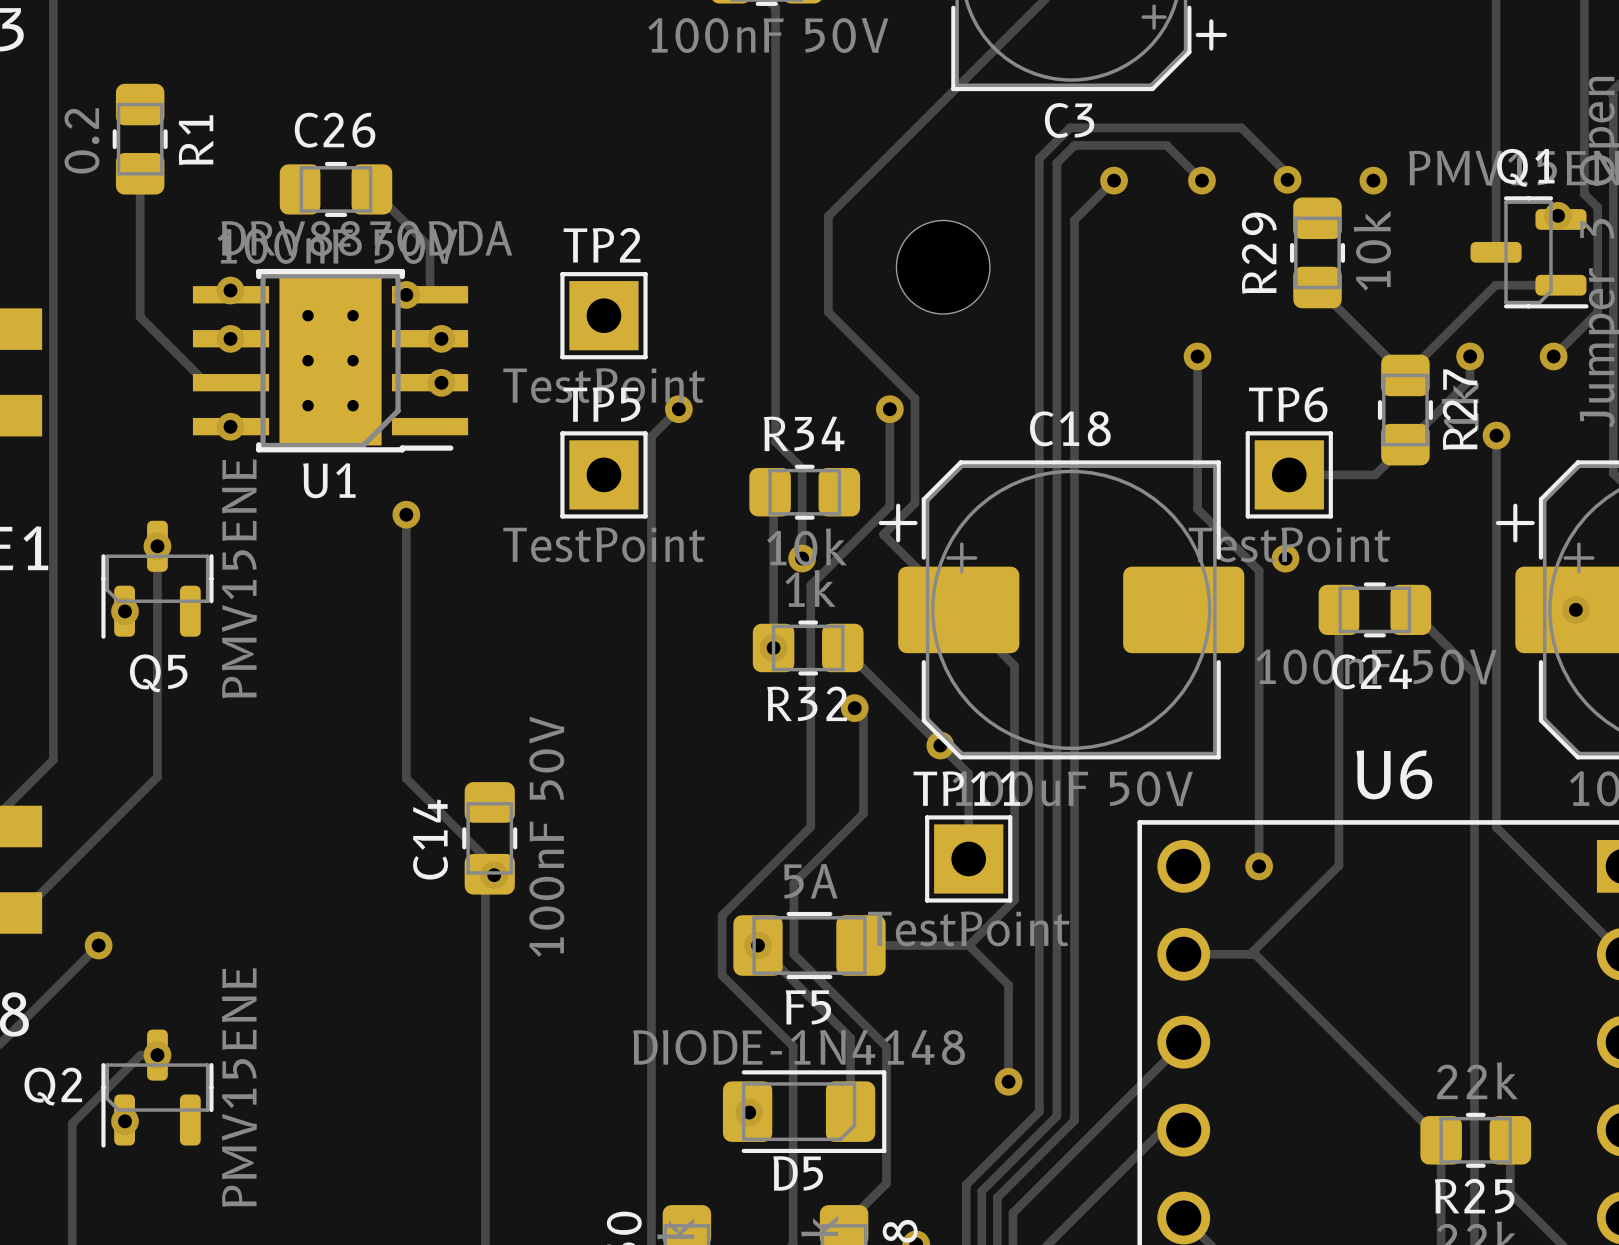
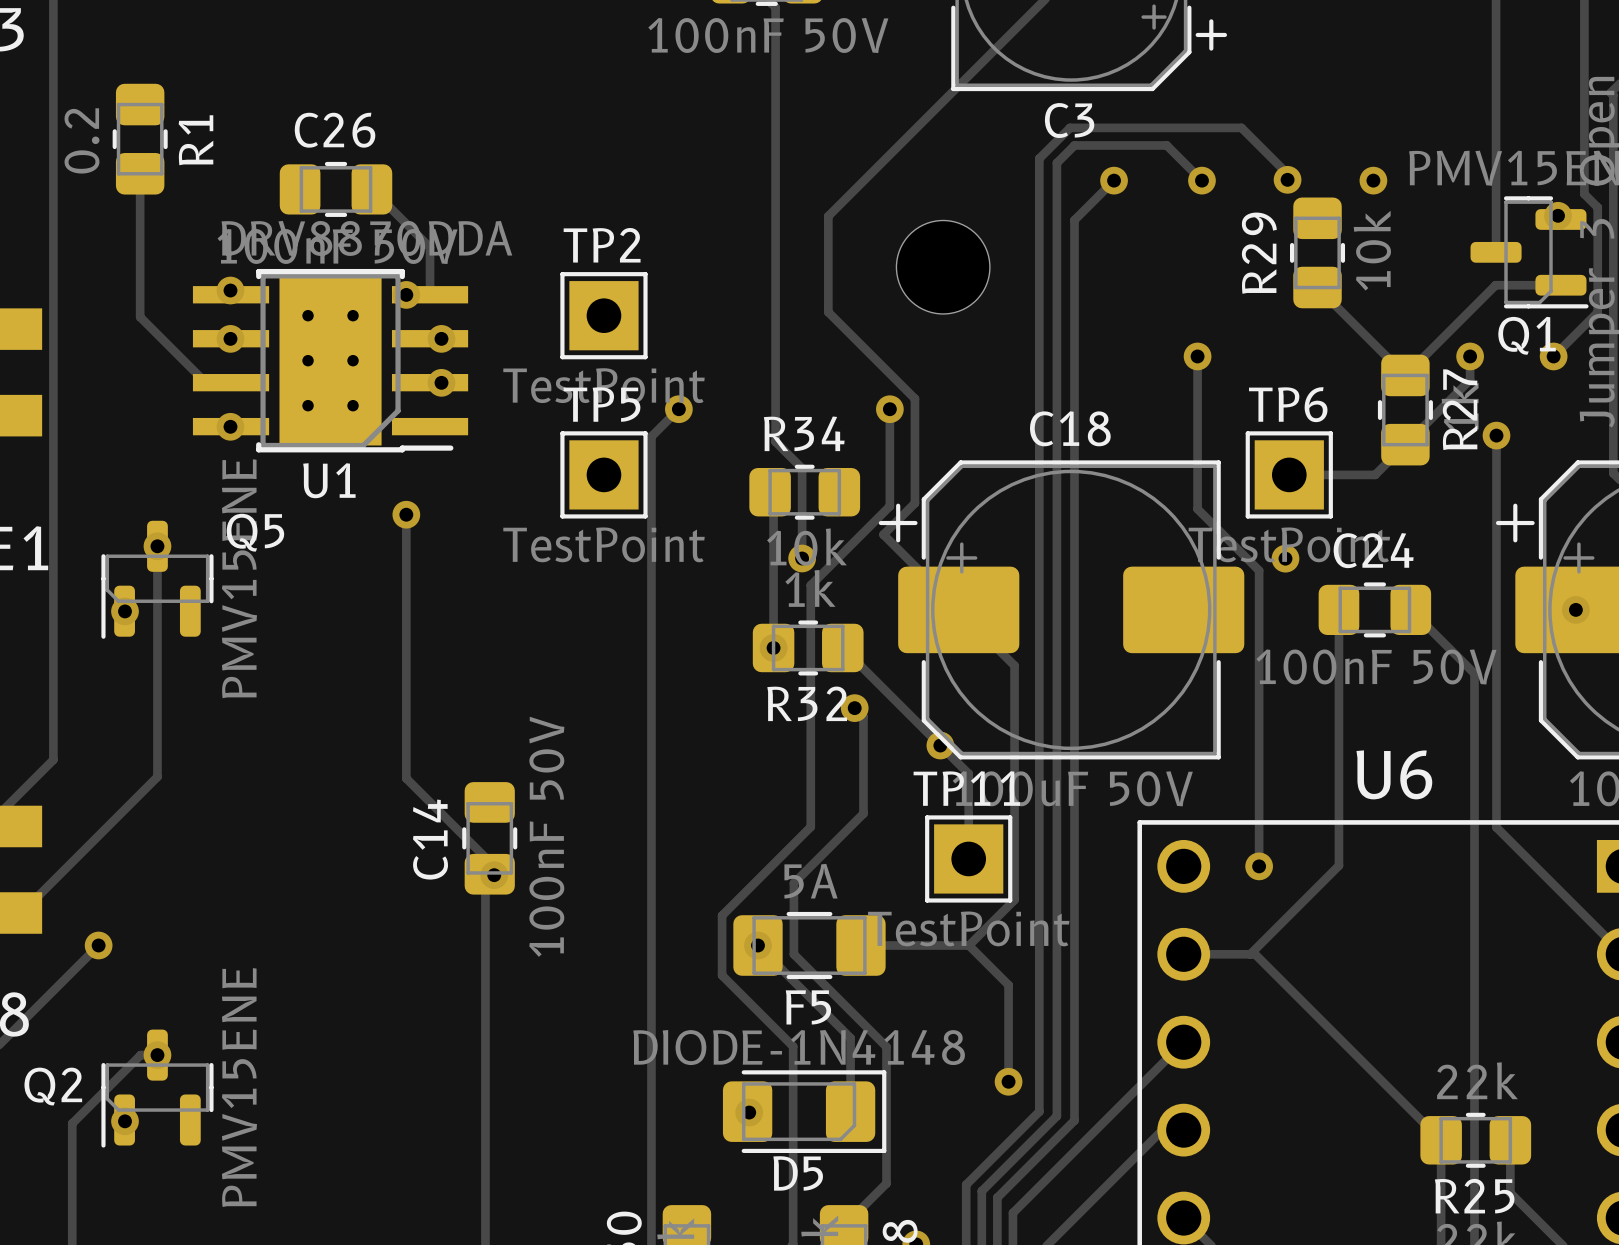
Q1 name position: Q1 (1525, 167) -> Q1 (1527, 335)
C24 name position: C24 (1372, 671) -> C24 (1373, 550)
Q5 name position: Q5 (158, 673) -> Q5 (255, 532)

